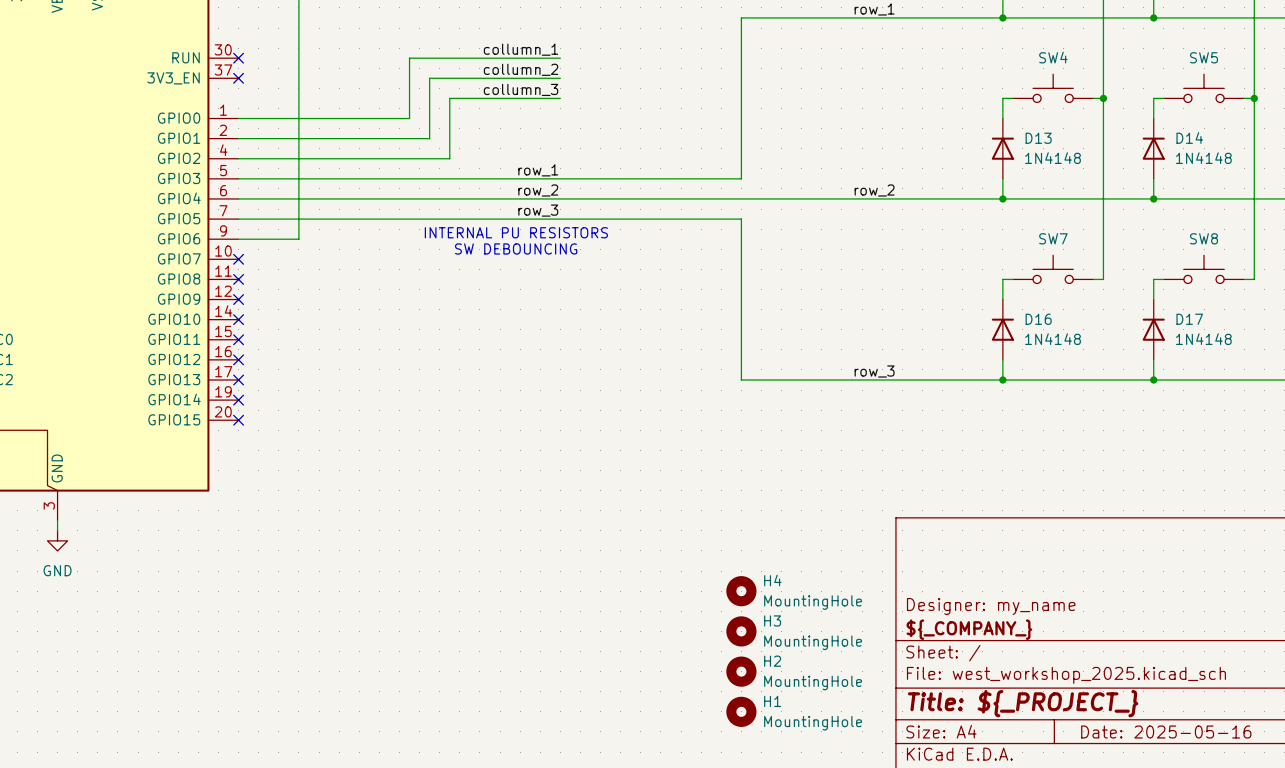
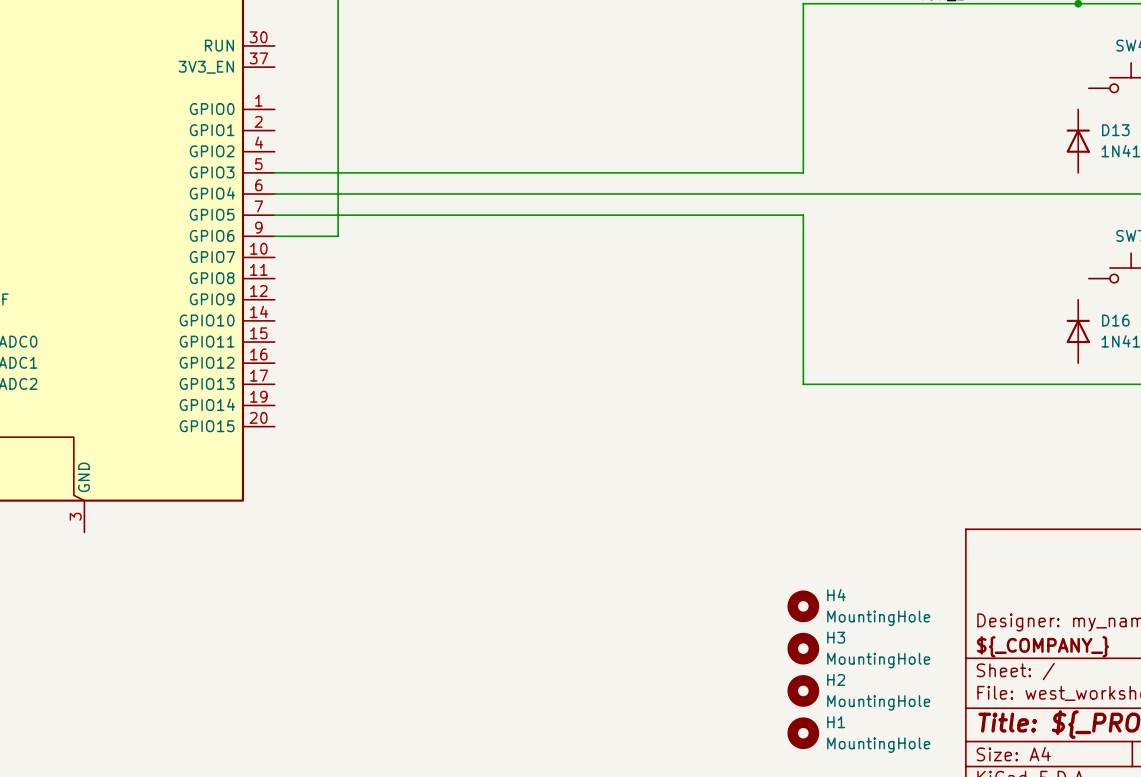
label: collumn_1 (521, 49) -> none
no-connect mark: (238, 58) -> none
wire: (560, 58) (409, 58) (409, 118) (238, 118) -> none
label: collumn_2 (521, 69) -> none
no-connect mark: (238, 78) -> none
wire: (560, 78) (429, 78) (429, 138) (238, 138) -> none
label: collumn_3 (521, 89) -> none
wire: (560, 98) (449, 98) (449, 158) (238, 158) -> none
wire: (1012, 98) (1002, 98) (1002, 118) -> none
label: row_1 (538, 170) -> none
wire: (1002, 178) (1002, 198) -> none
label: row_2 (538, 190) -> none
label: row_2 (874, 190) -> none
junction: (1002, 198) -> none
label: row_3 (538, 210) -> none
text: INTERNAL PU RESISTORS (516, 232) -> none
text: SW DEBOUNCING (516, 248) -> none
no-connect mark: (238, 259) -> none
no-connect mark: (238, 279) -> none
wire: (1012, 279) (1002, 279) (1002, 299) -> none
no-connect mark: (238, 299) -> none
no-connect mark: (238, 319) -> none
no-connect mark: (238, 339) -> none
no-connect mark: (238, 359) -> none
wire: (1002, 359) (1002, 379) -> none
label: row_3 (874, 371) -> none
no-connect mark: (238, 379) -> none
junction: (1002, 379) -> none
no-connect mark: (238, 400) -> none
no-connect mark: (238, 420) -> none
wire: (57, 520) (57, 530) -> none
power symbol: GND (57, 540) -> none

